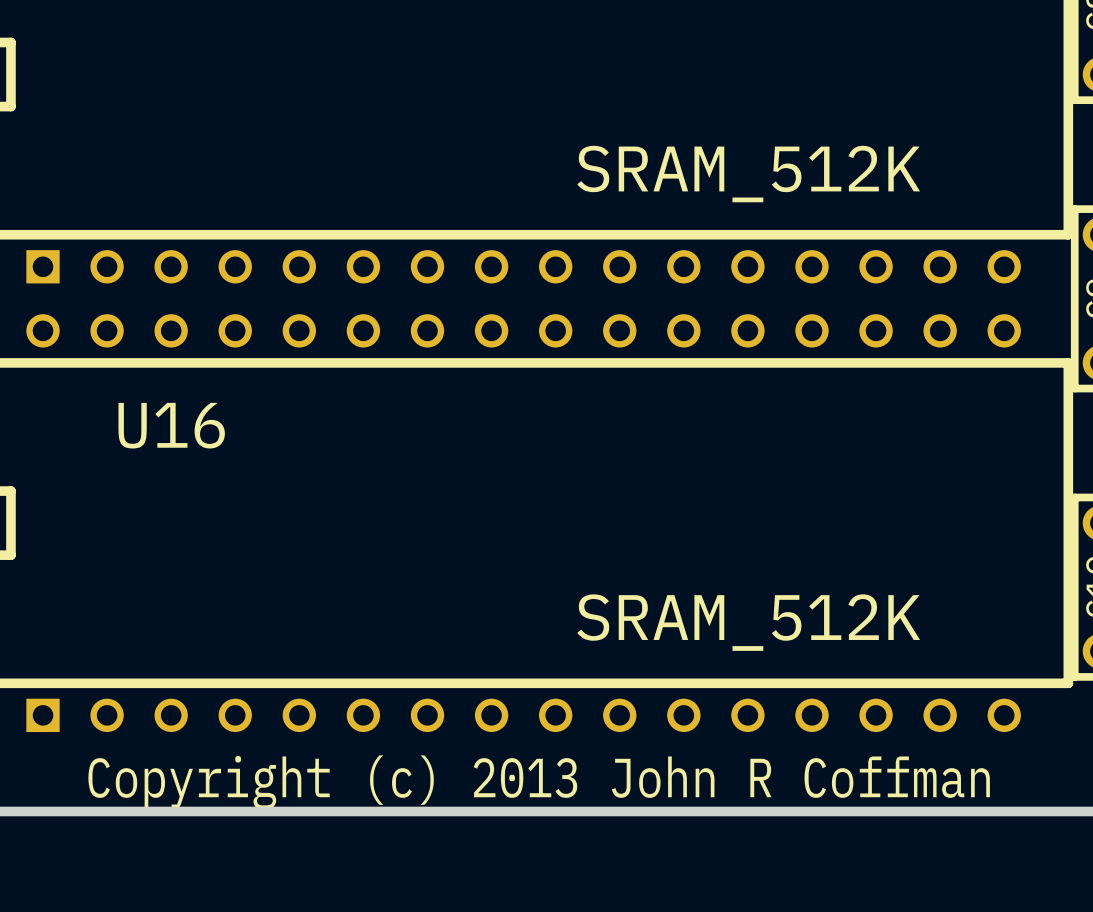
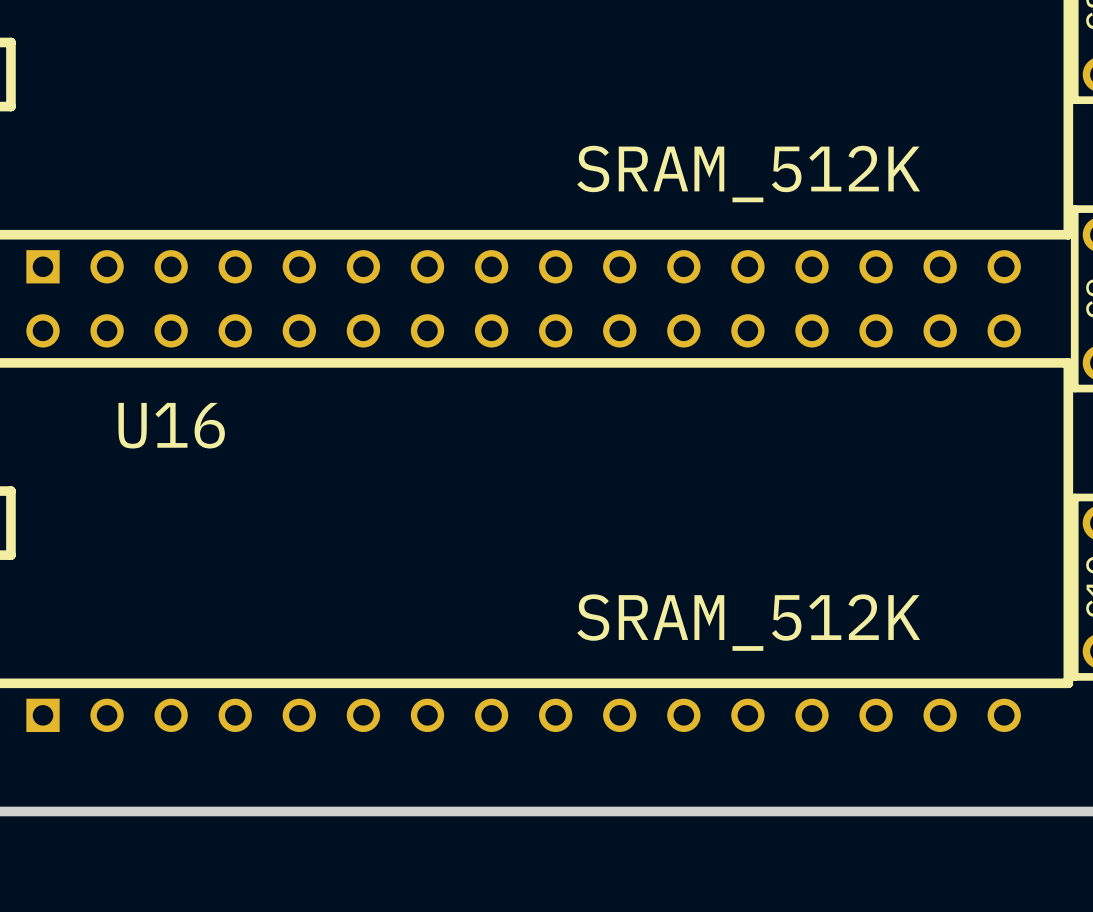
text: Copyright (c) 2013 John R Coffman (539, 782) -> none

